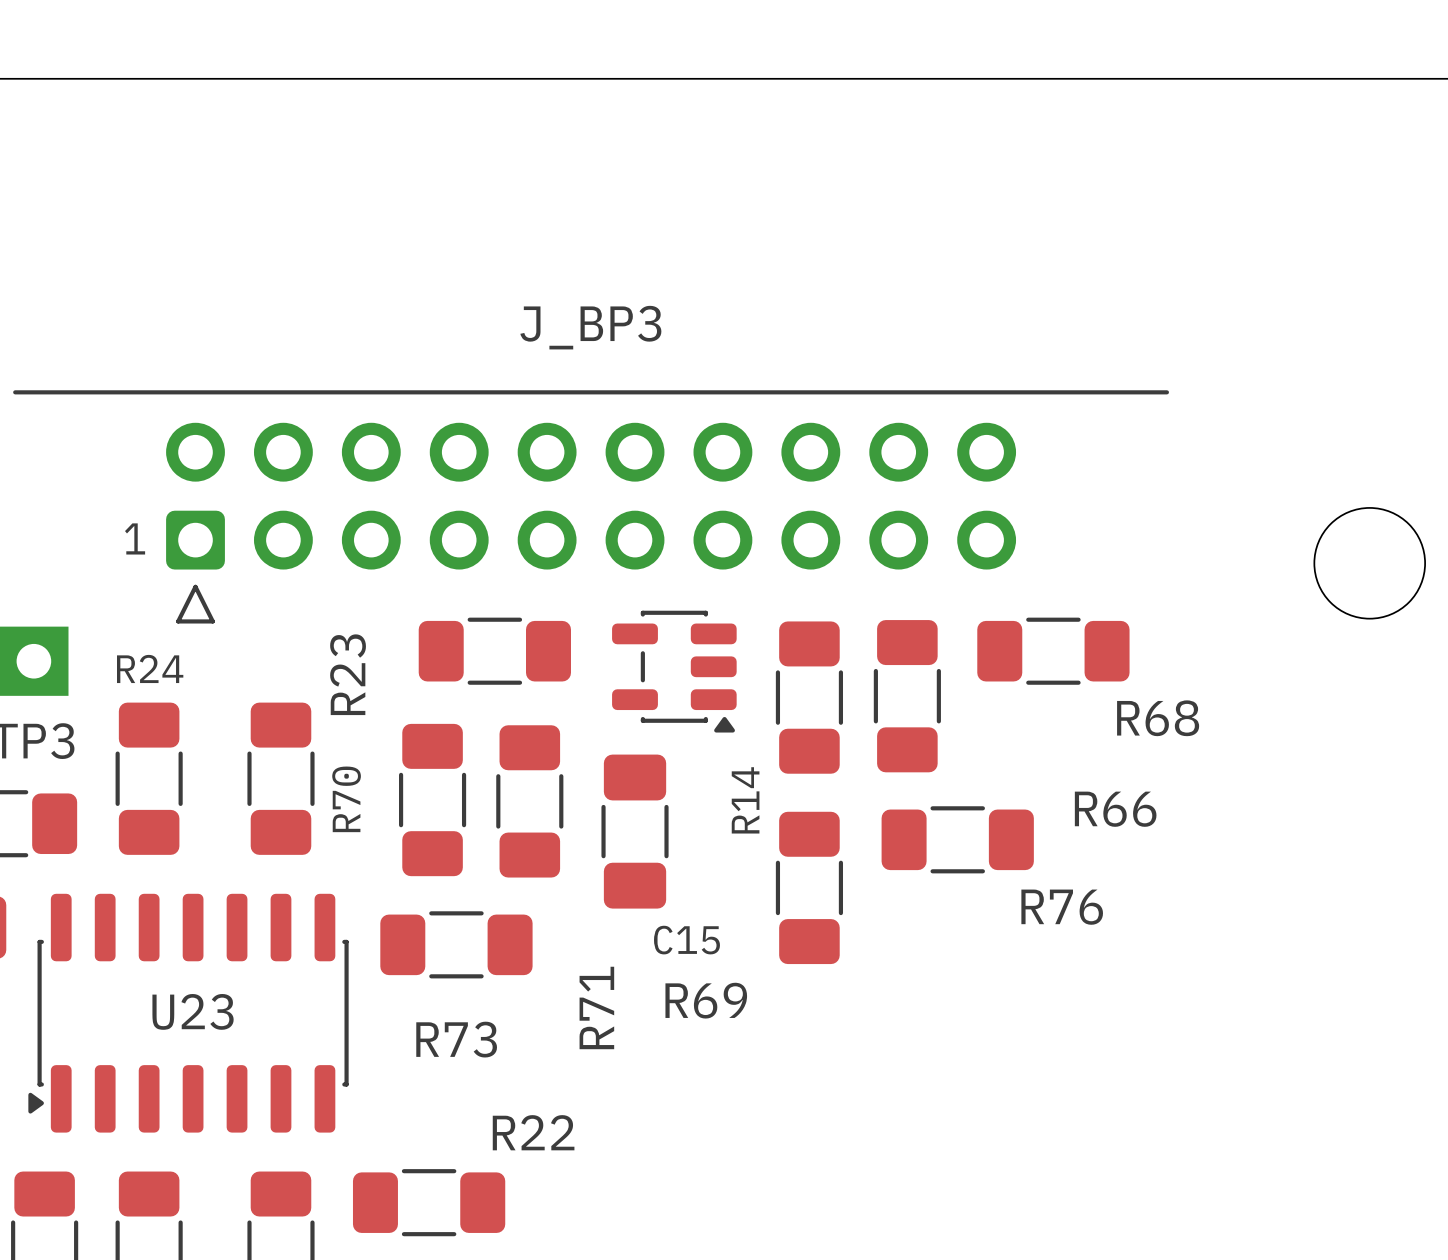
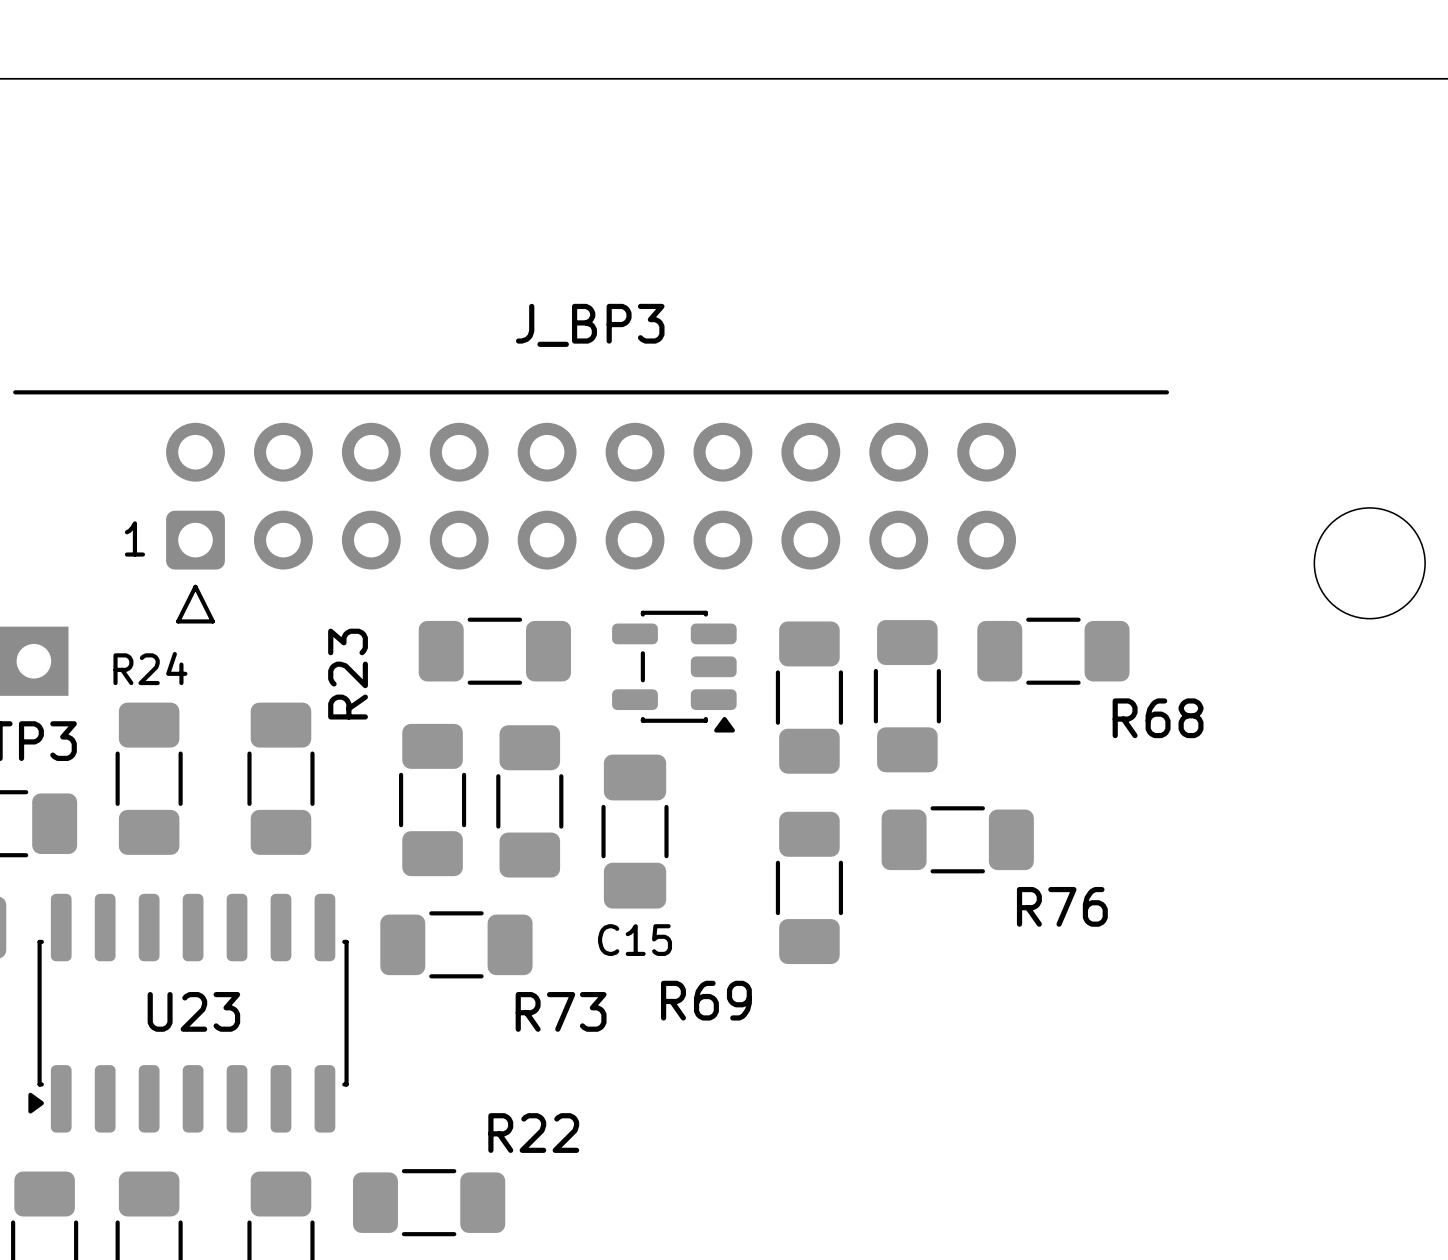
R70 name: R70 (346, 799) -> none
R14 name: R14 (745, 800) -> none
R66 name: R66 (1115, 809) -> none
C15 name position: C15 (686, 940) -> C15 (635, 940)
R71 name: R71 (596, 1007) -> none
R73 name position: R73 (456, 1039) -> R73 (561, 1011)

